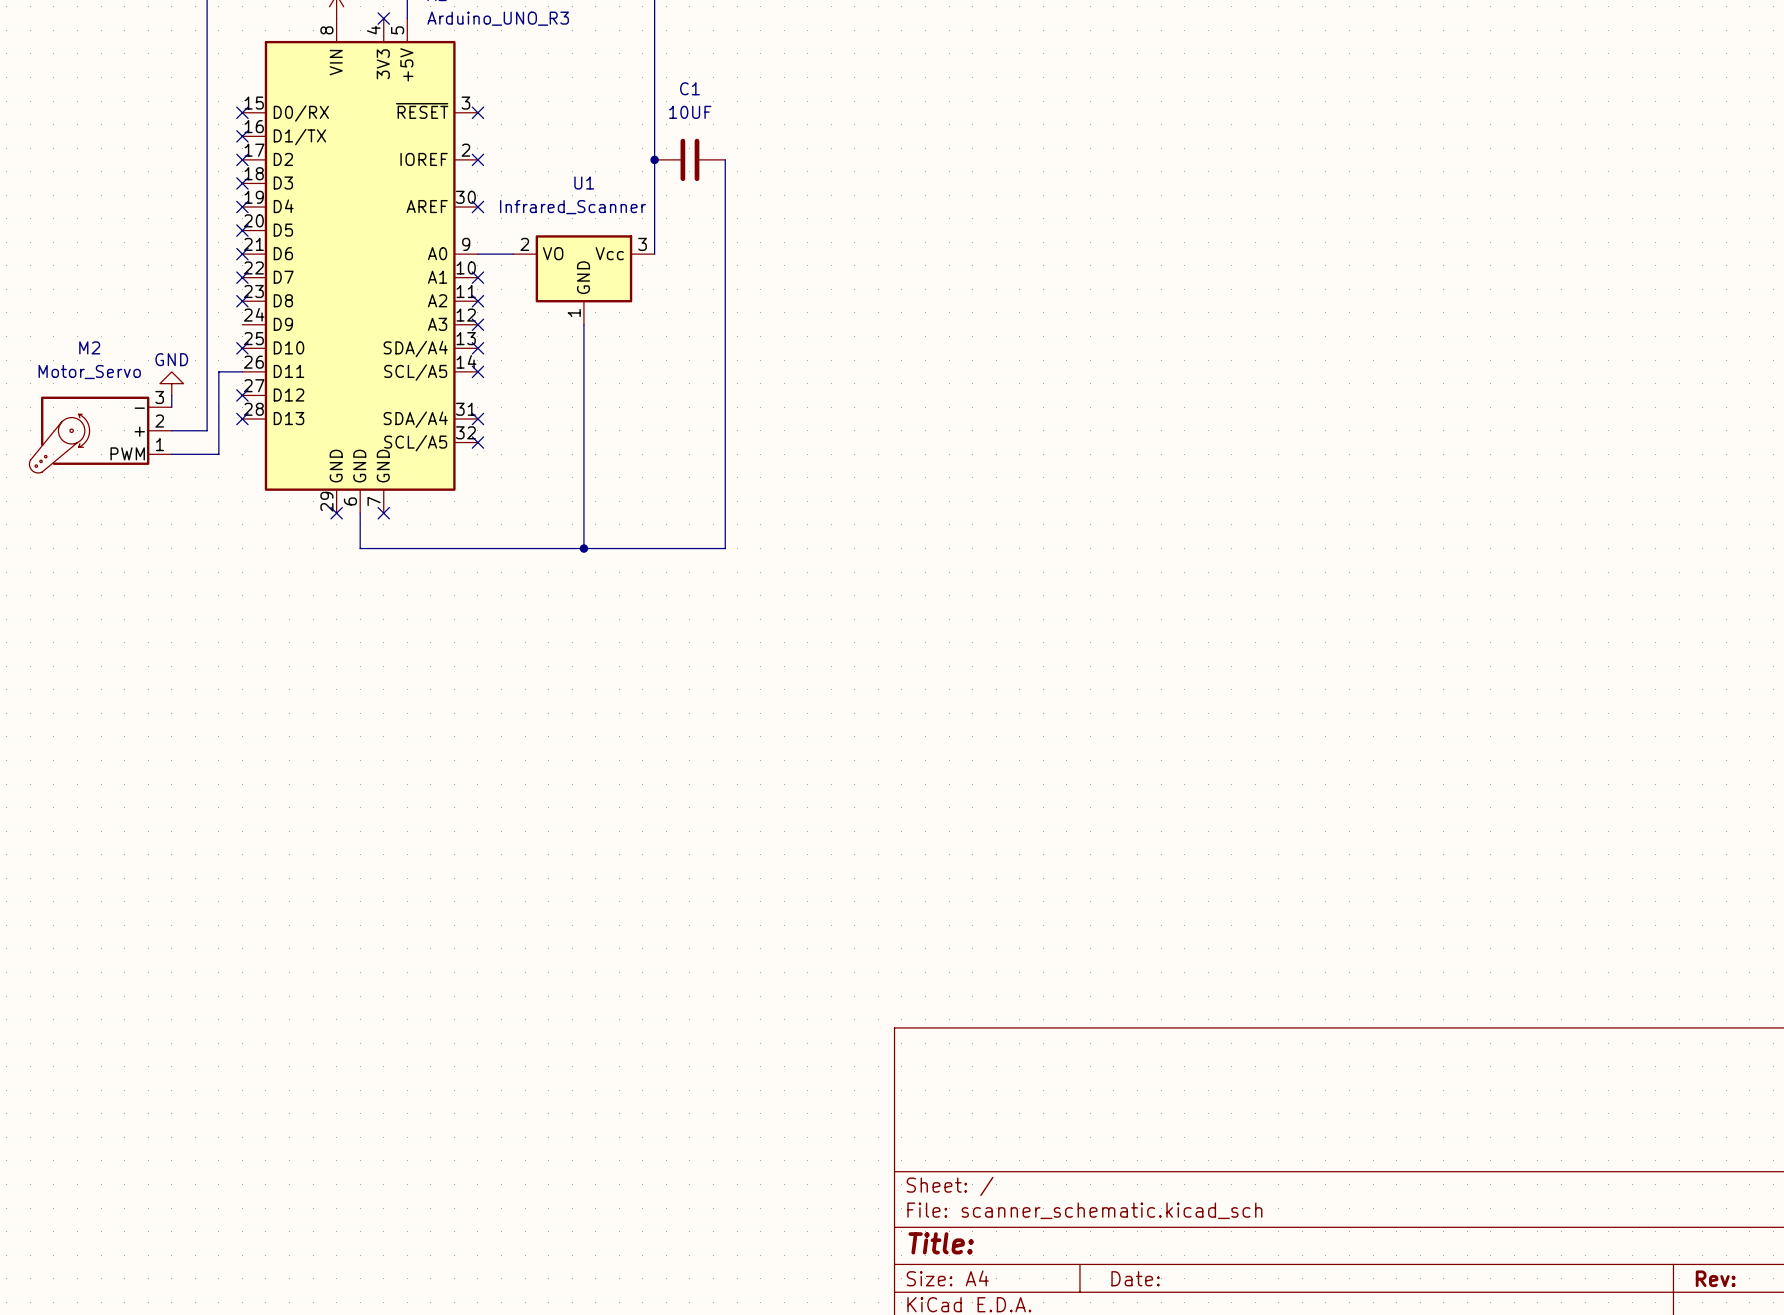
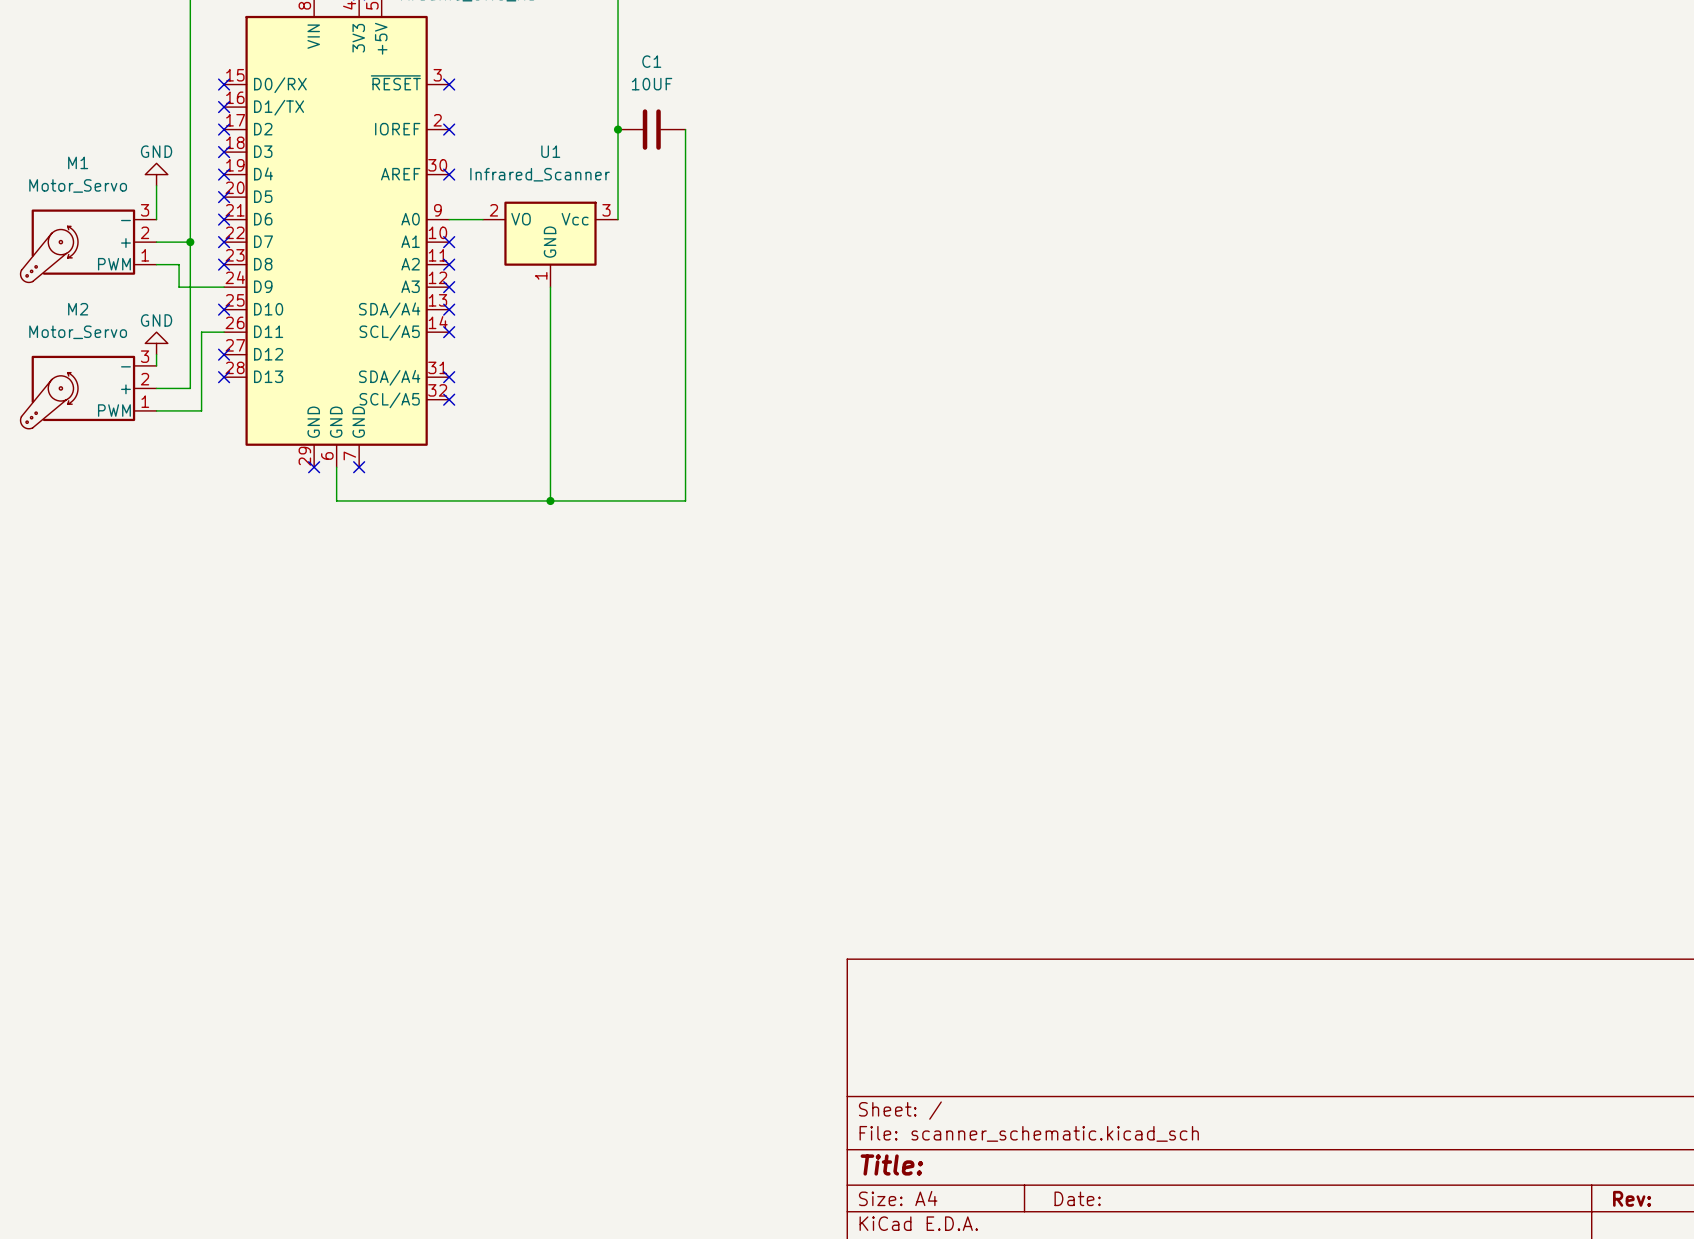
power symbol: none -> GND (156, 174)
wire: none -> (156, 185) (156, 219)
wire: none -> (156, 242) (190, 242)
junction: none -> (190, 242)
M1: none -> Motor_Servo (88, 245)
wire: none -> (156, 264) (179, 264) (179, 287) (224, 287)

